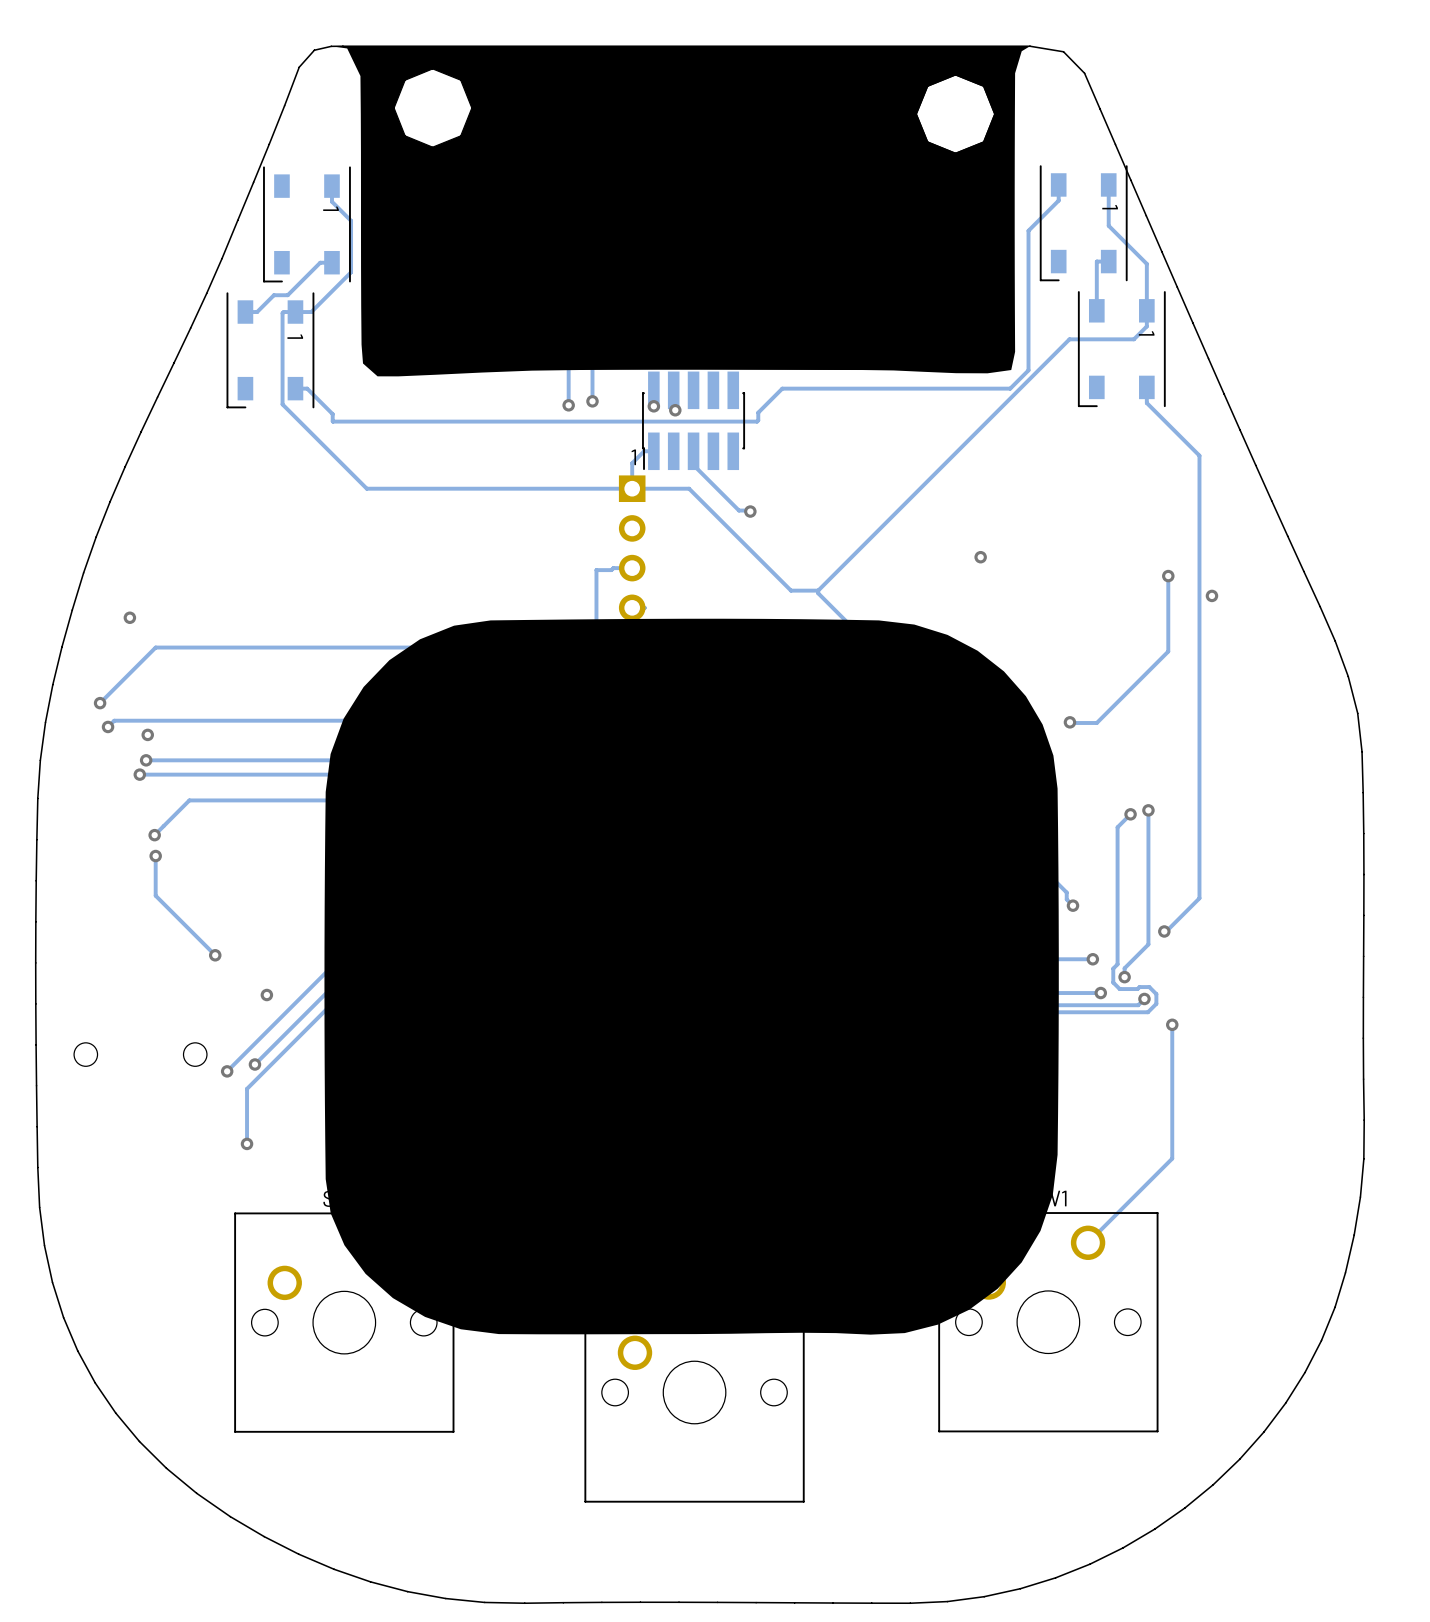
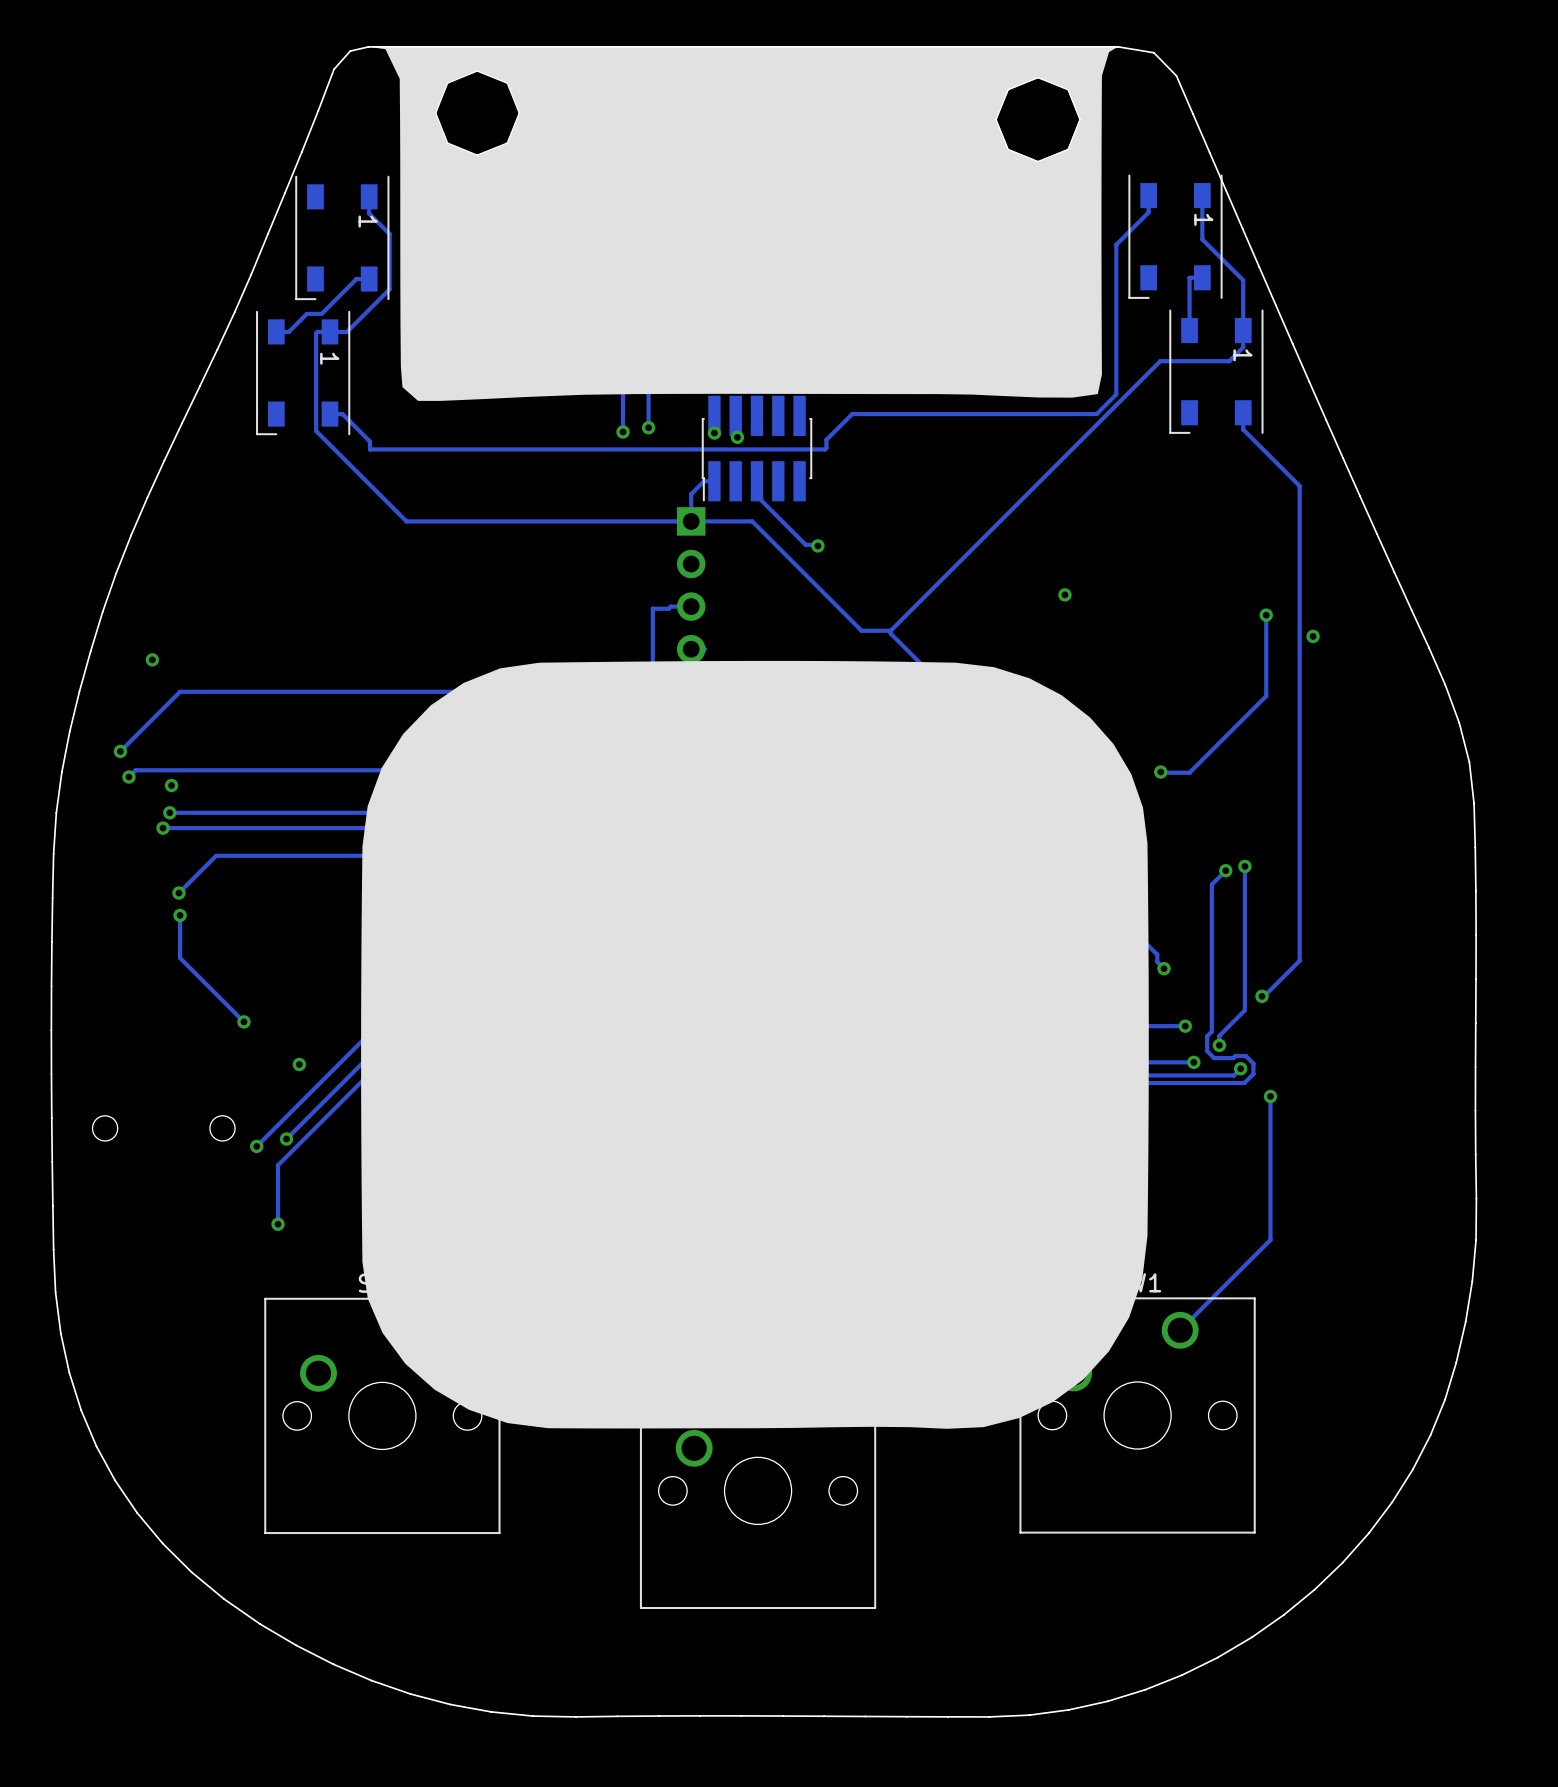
text: 1 (633, 457) -> none

